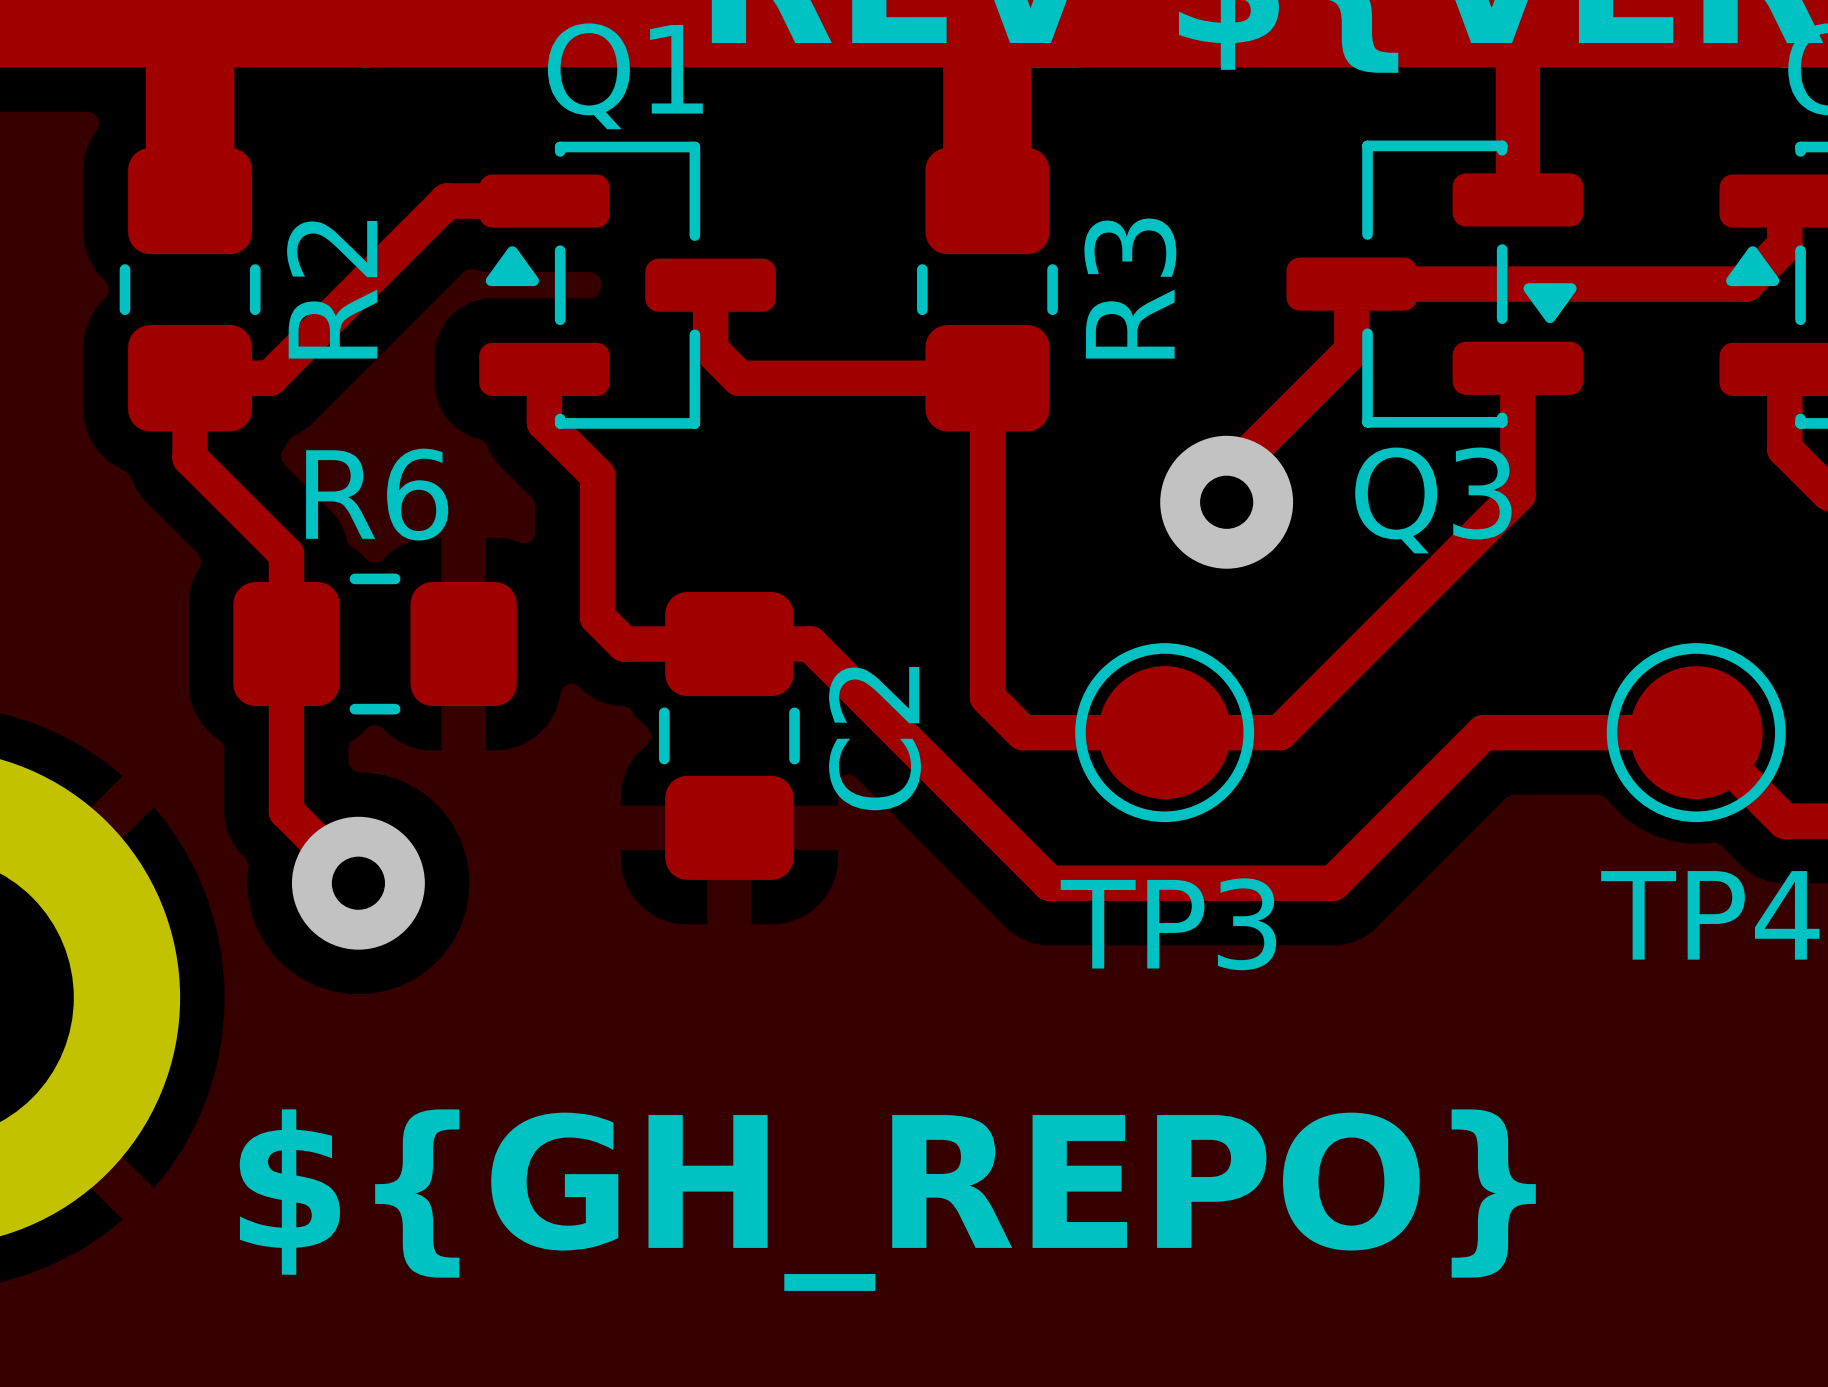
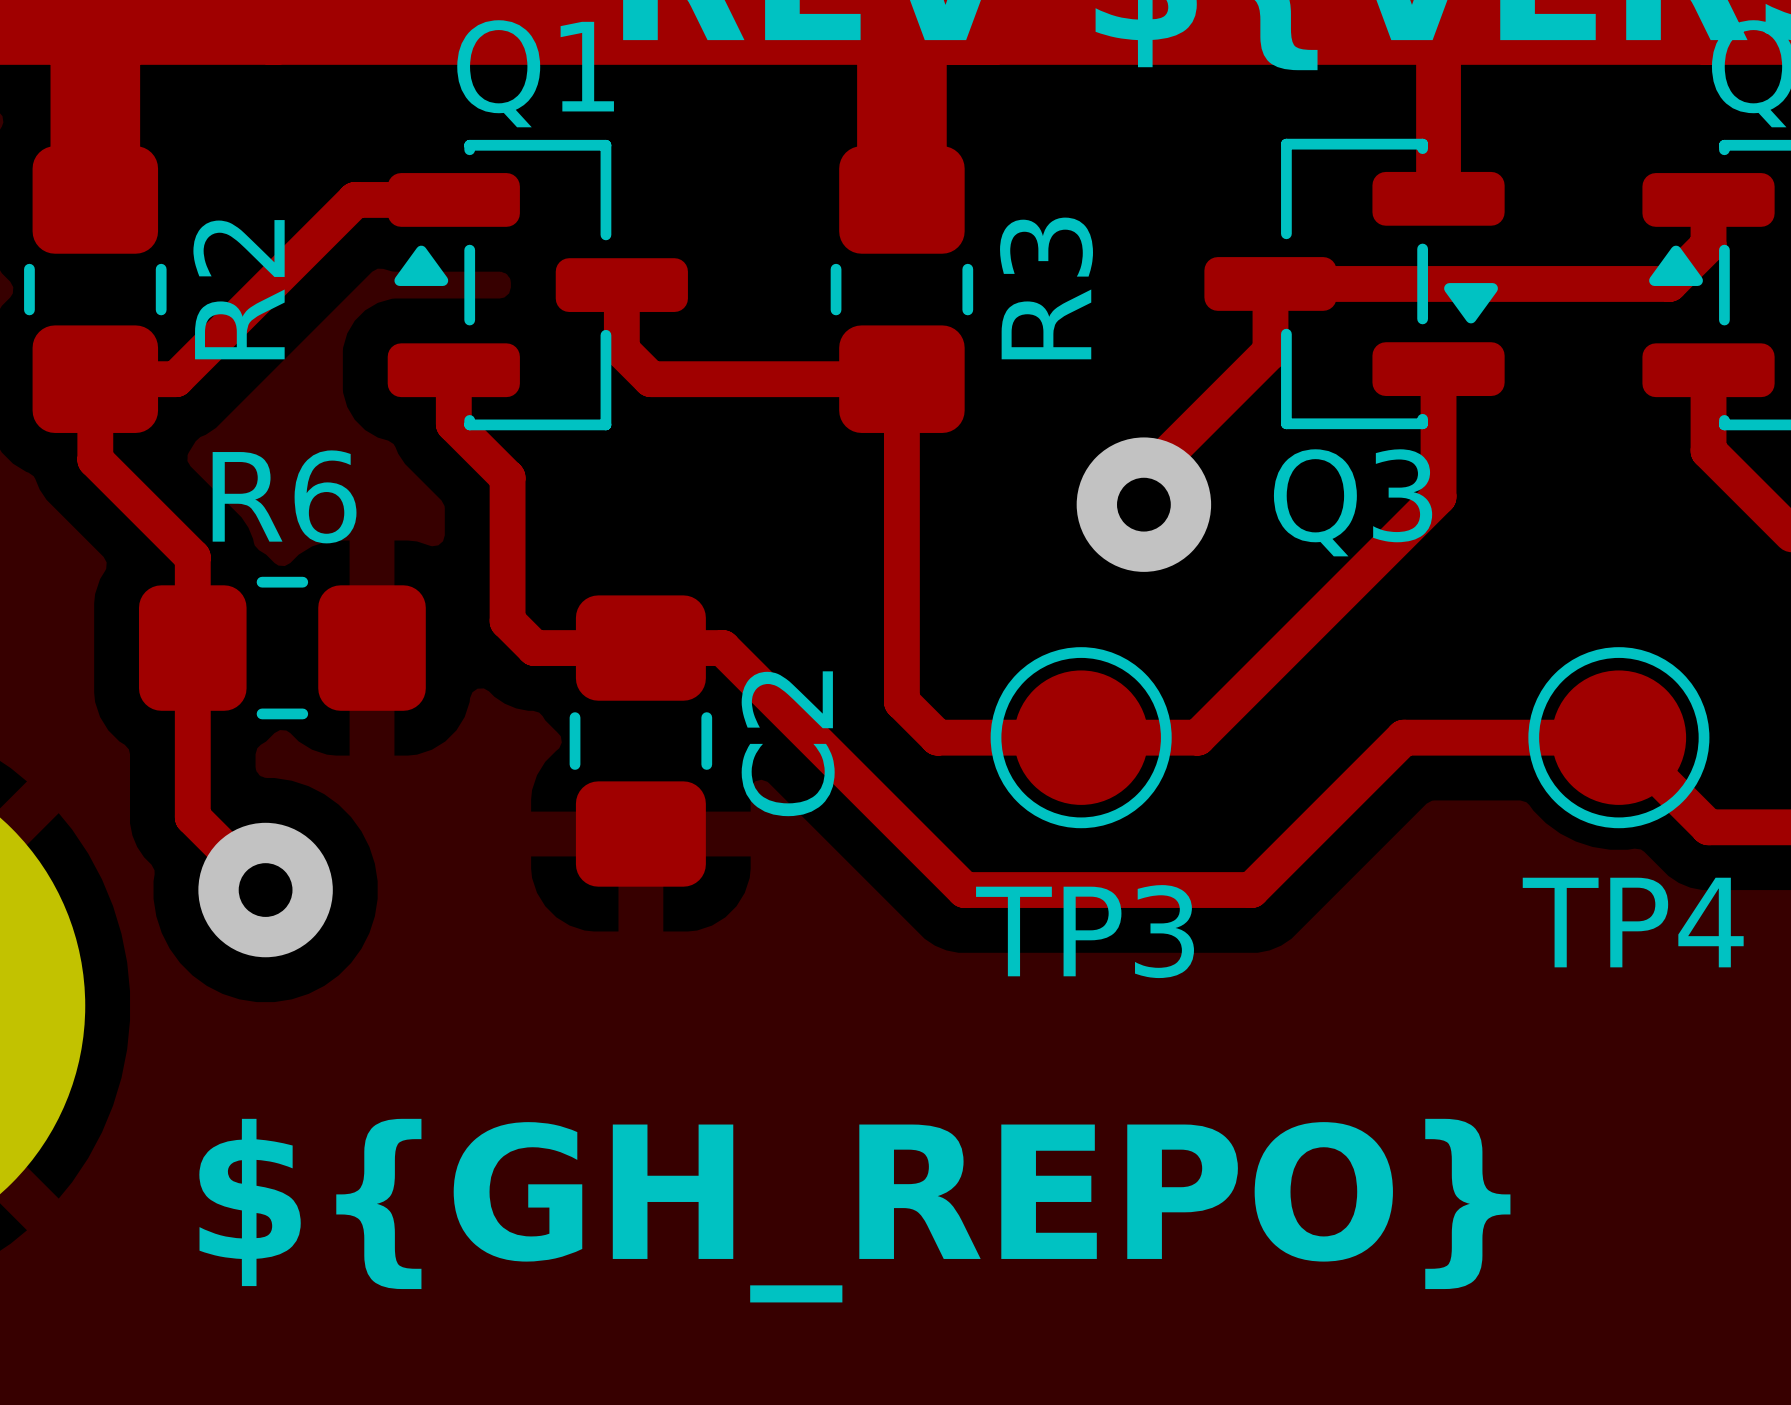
text position: ${GH_REPO} (887, 1200) -> ${GH_REPO} (854, 1210)

